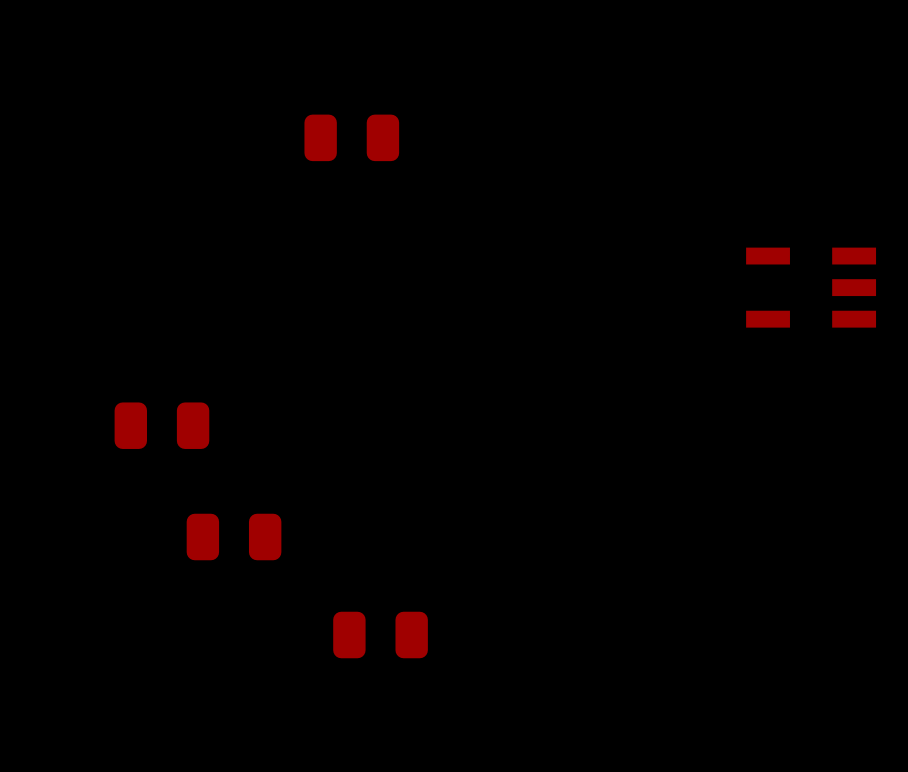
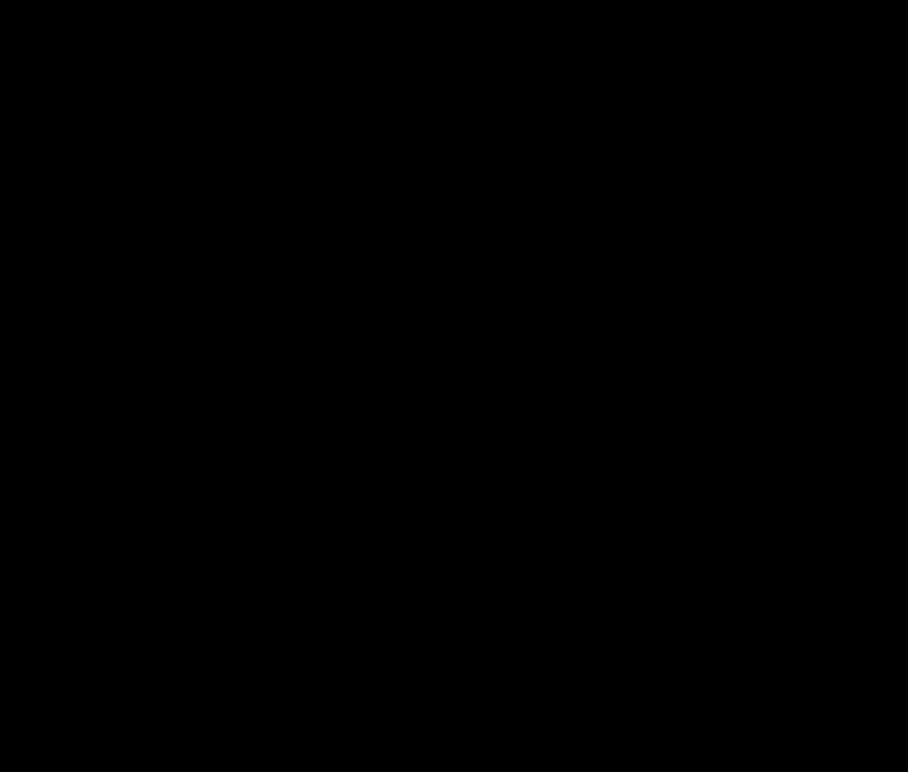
part: (351, 137) -> none
part: (811, 287) -> none
part: (161, 425) -> none
part: (234, 537) -> none
part: (380, 635) -> none

